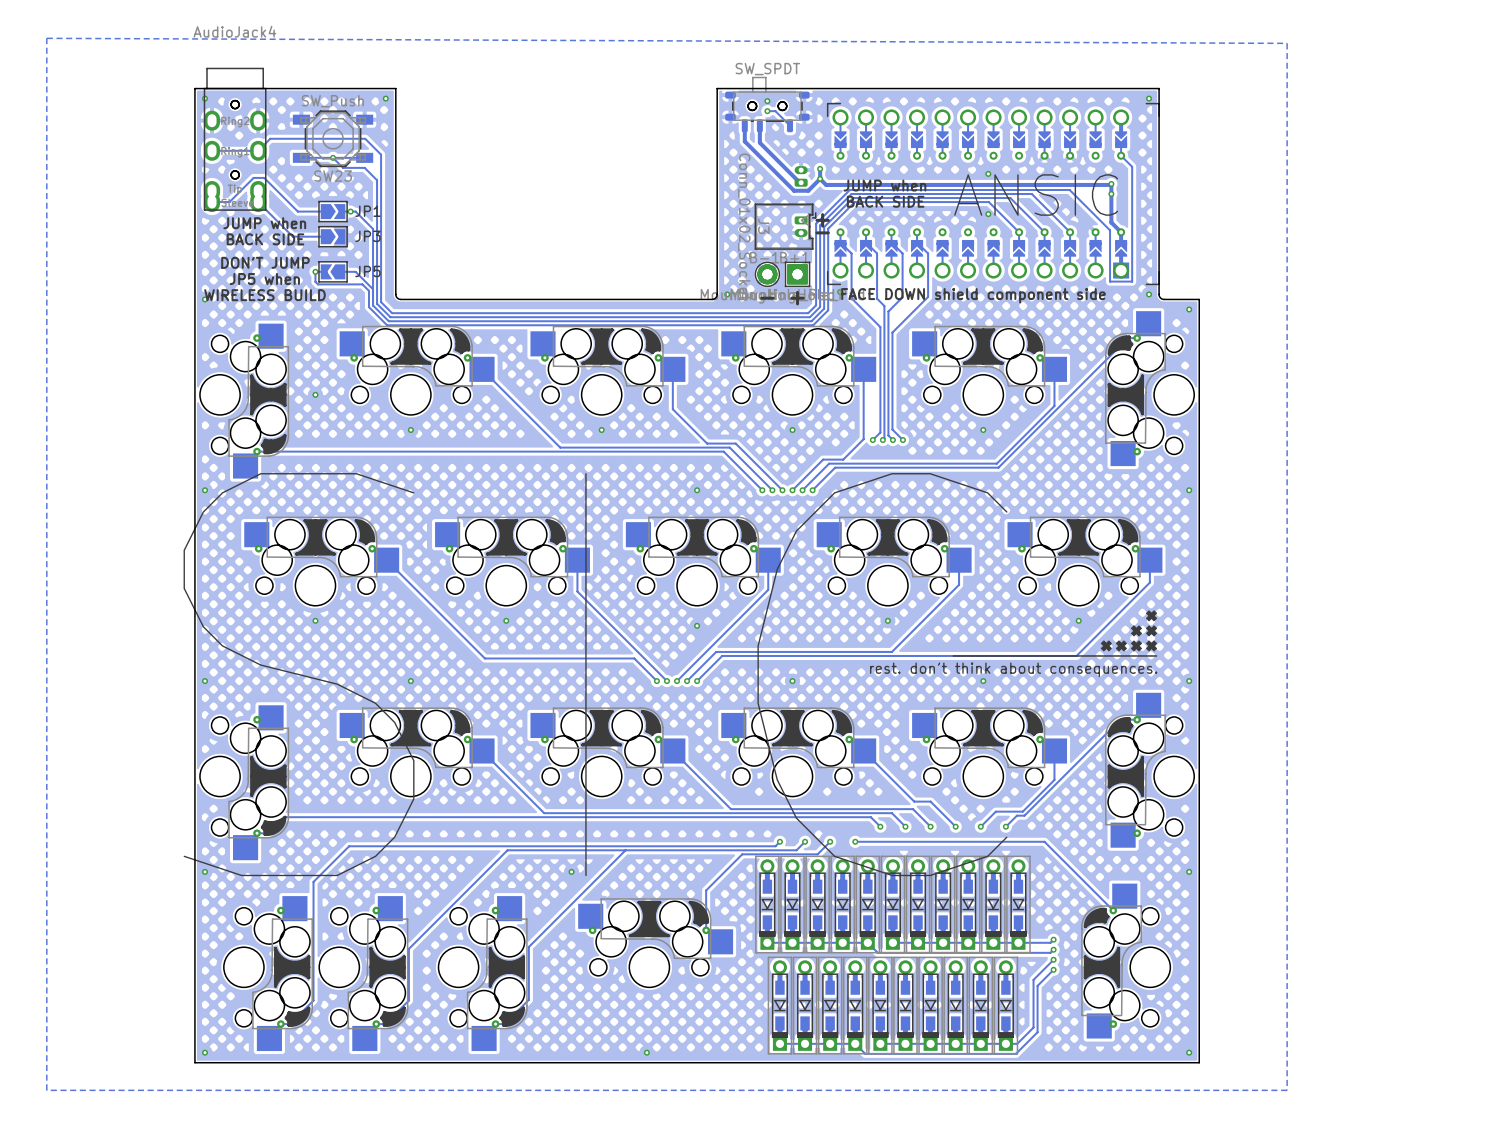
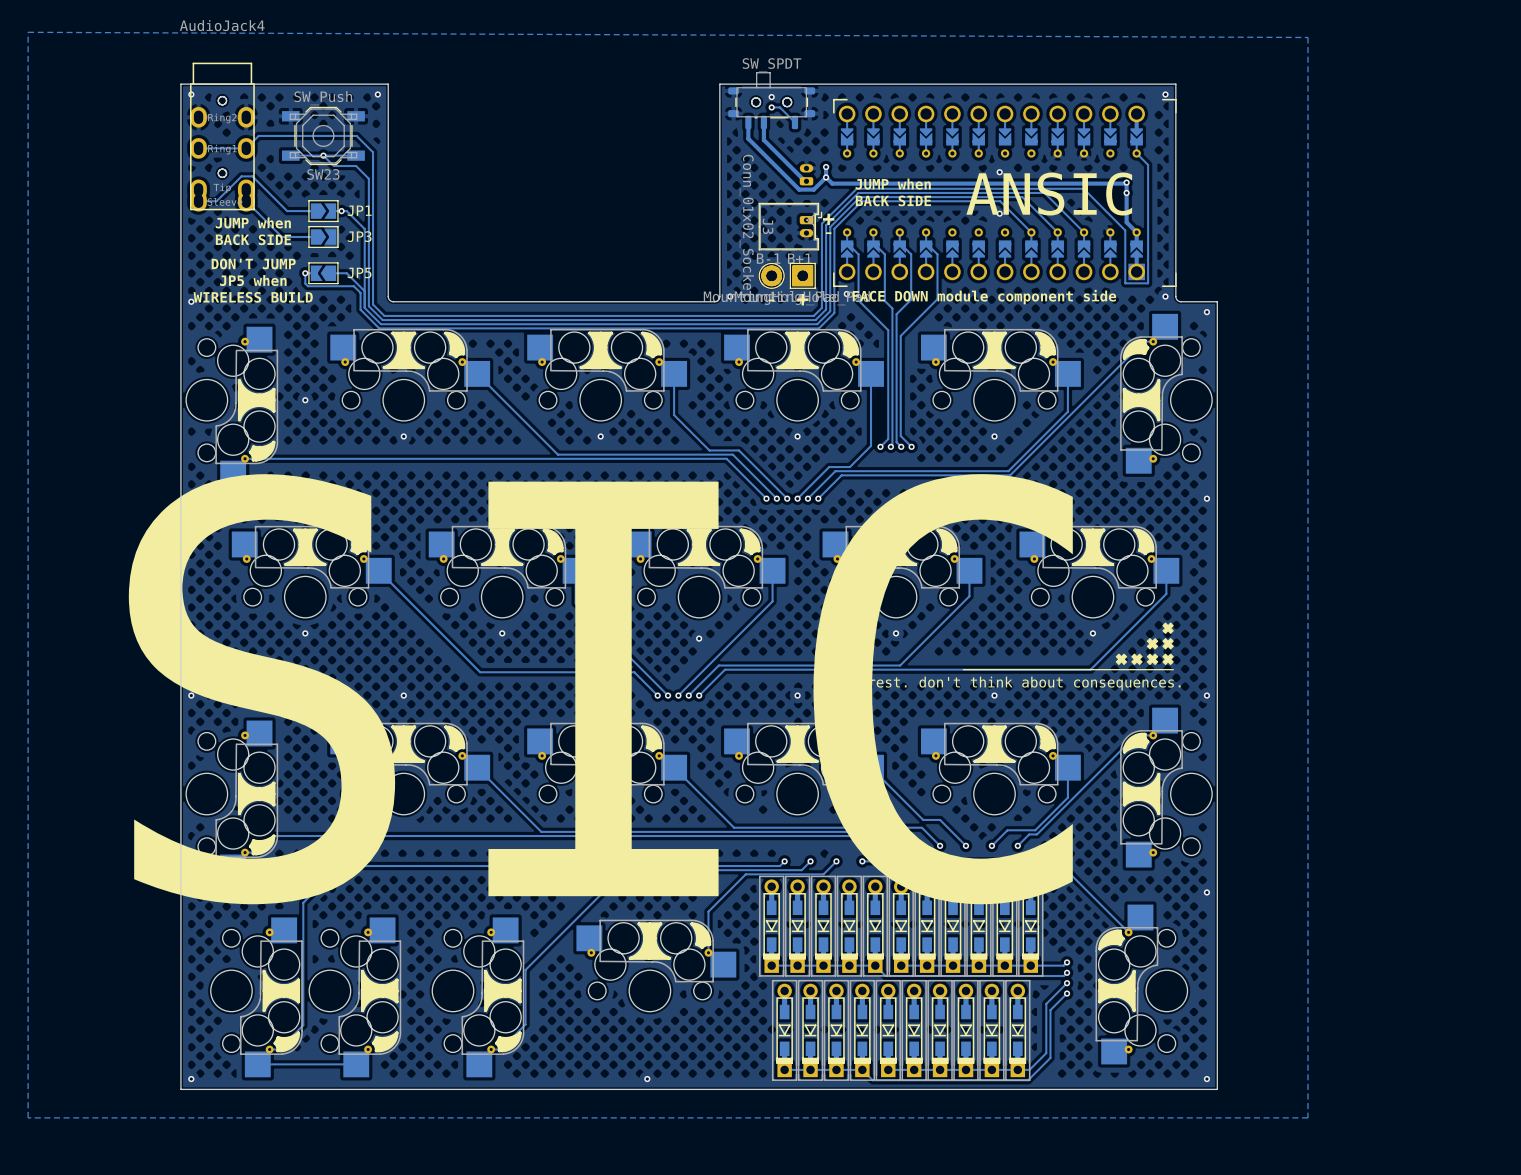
text: FACE DOWN shield component side (973, 295) -> FACE DOWN module component side (984, 297)
track: (625, 850) (507, 850) (408, 948) (408, 1000) (385, 1024) (376, 1024) -> none
track: none -> (356, 1064) (257, 1064)

